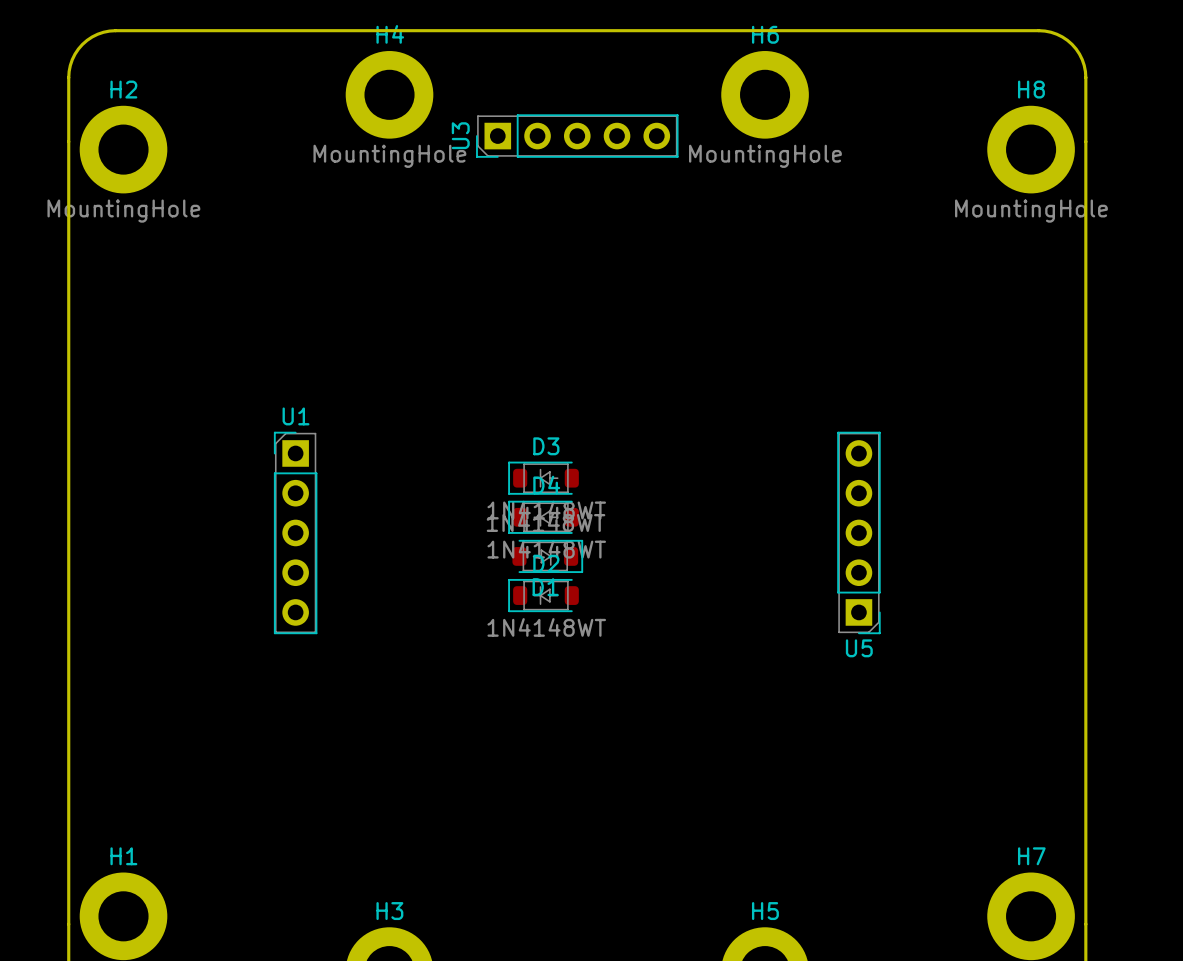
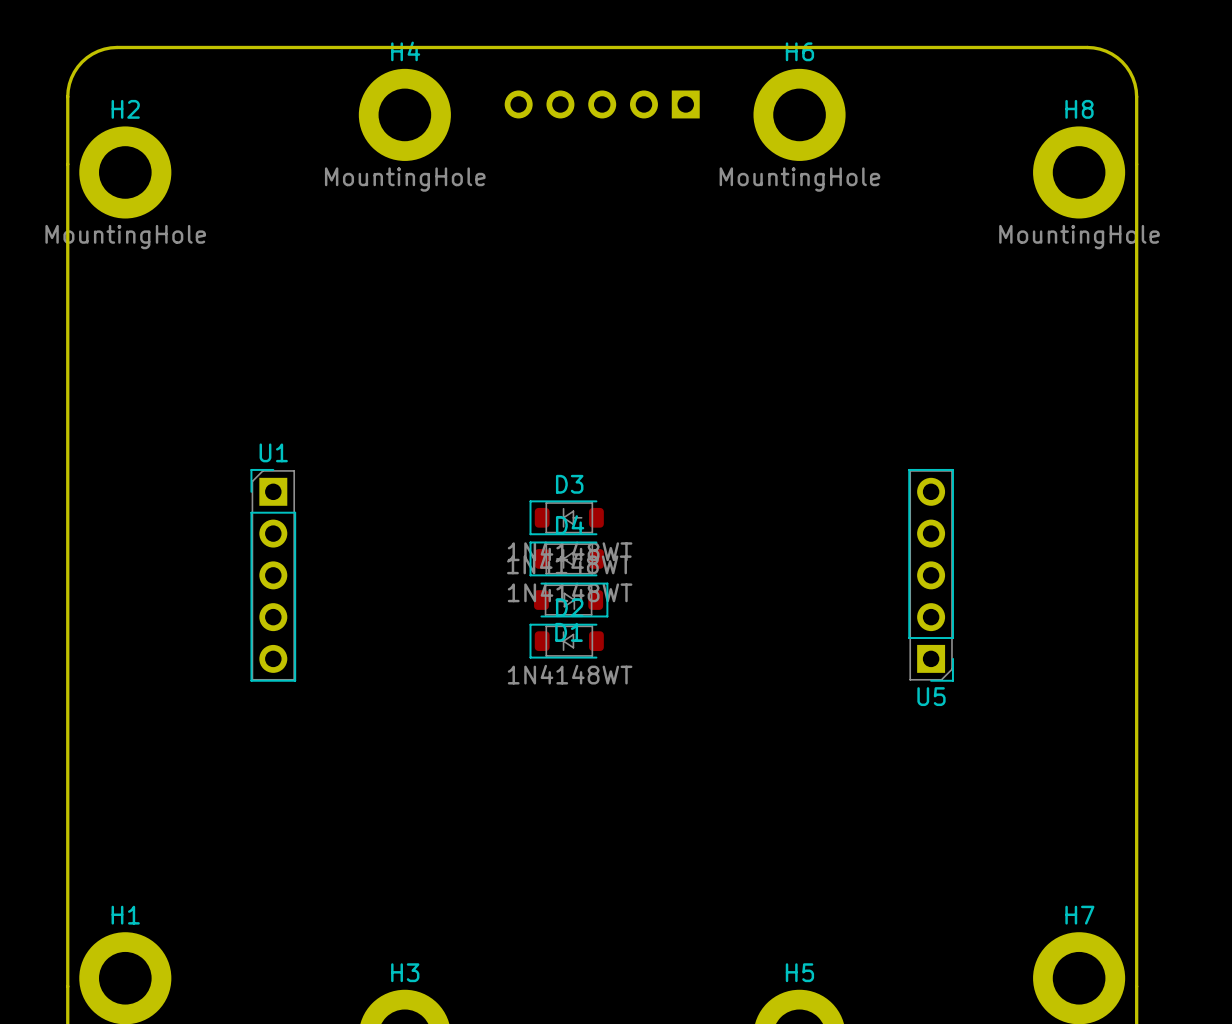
U3 side: top (577, 136) -> bottom (602, 104)
U1 position: (295, 532) -> (273, 575)
U5 position: (858, 532) -> (931, 575)

